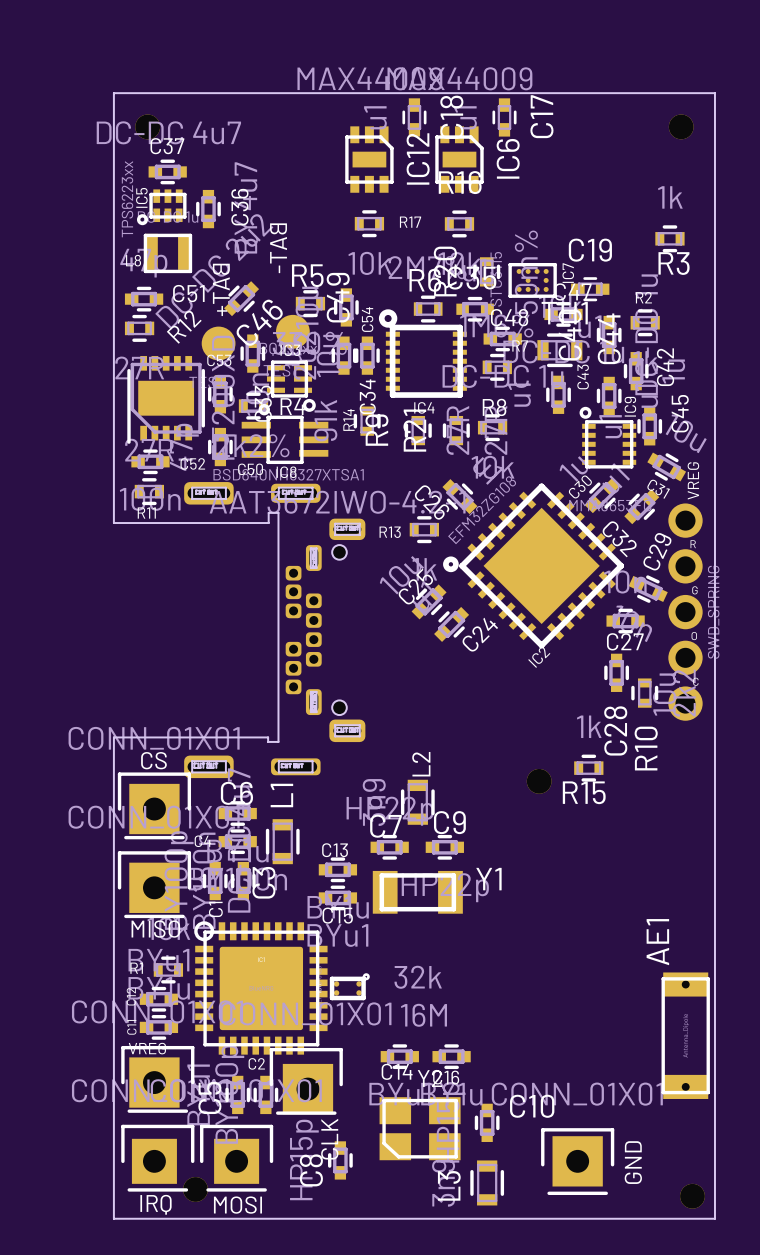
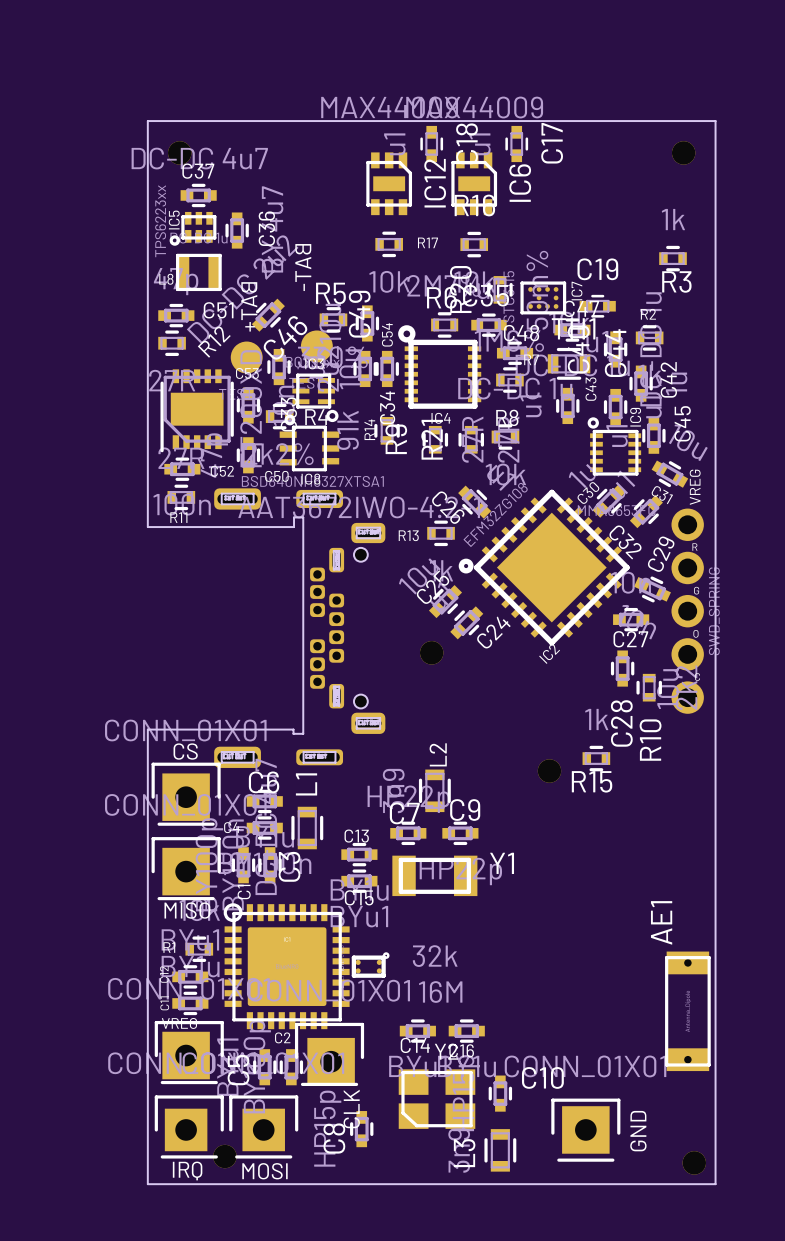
IC8 footprint: [241, 403, 329, 465] -> [279, 414, 340, 472]
part: none -> (431, 652)

